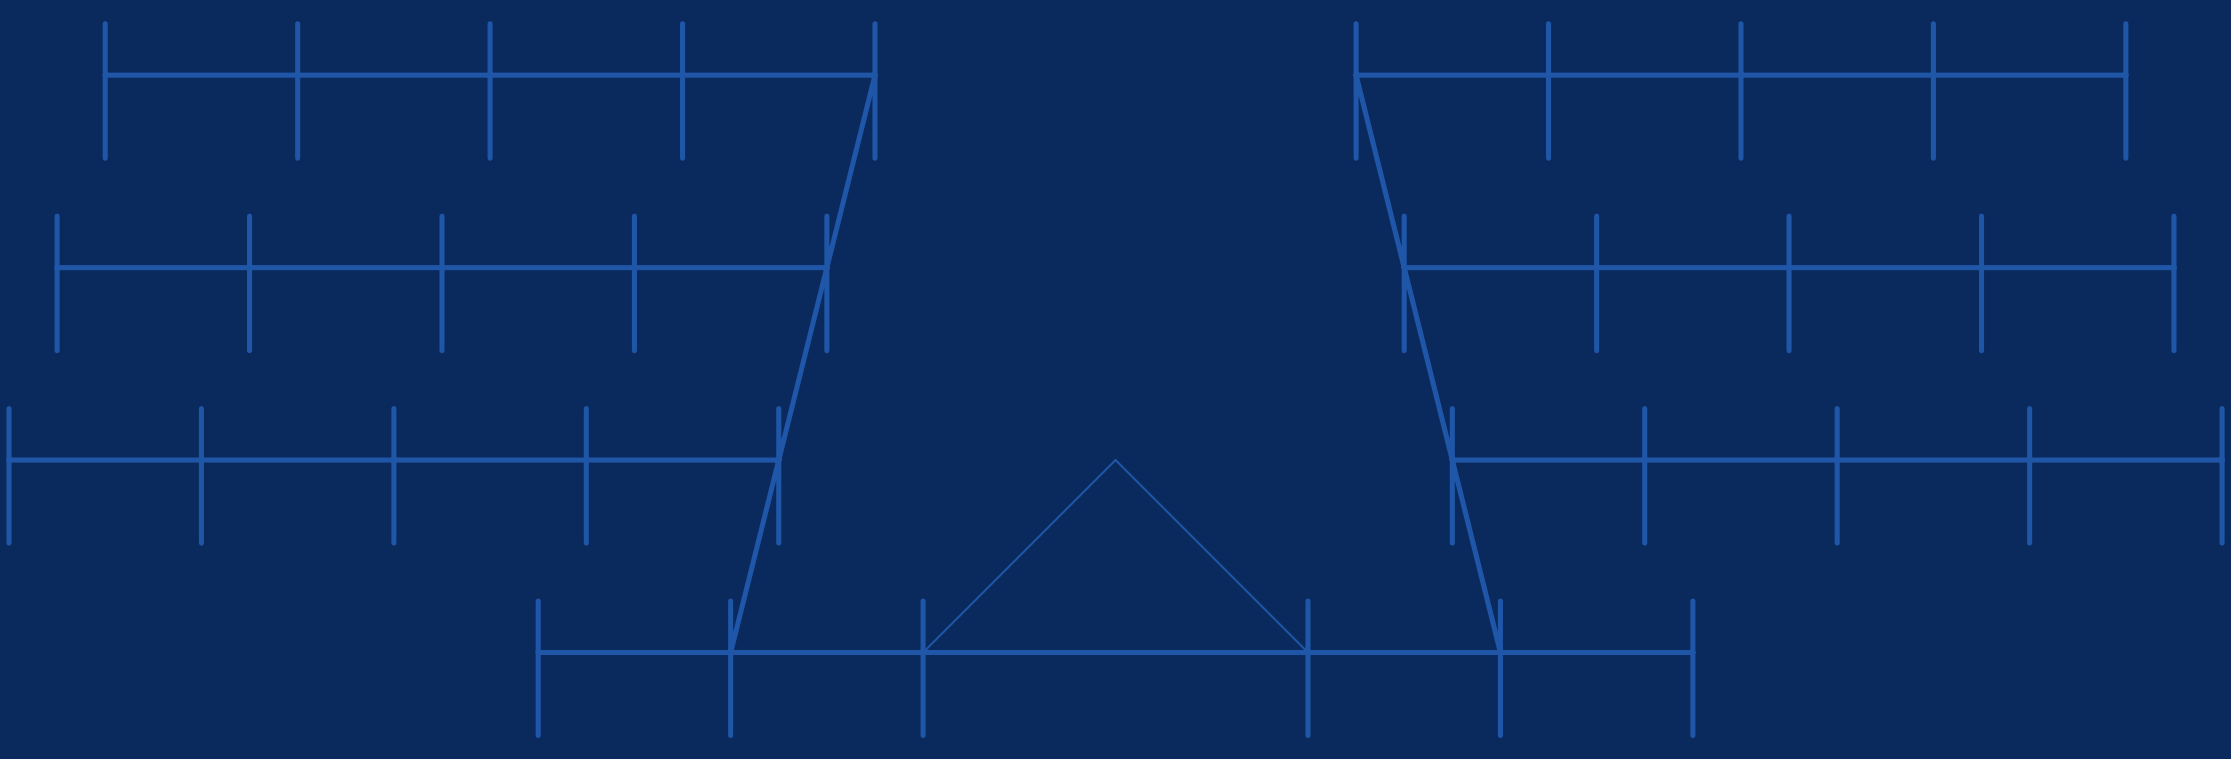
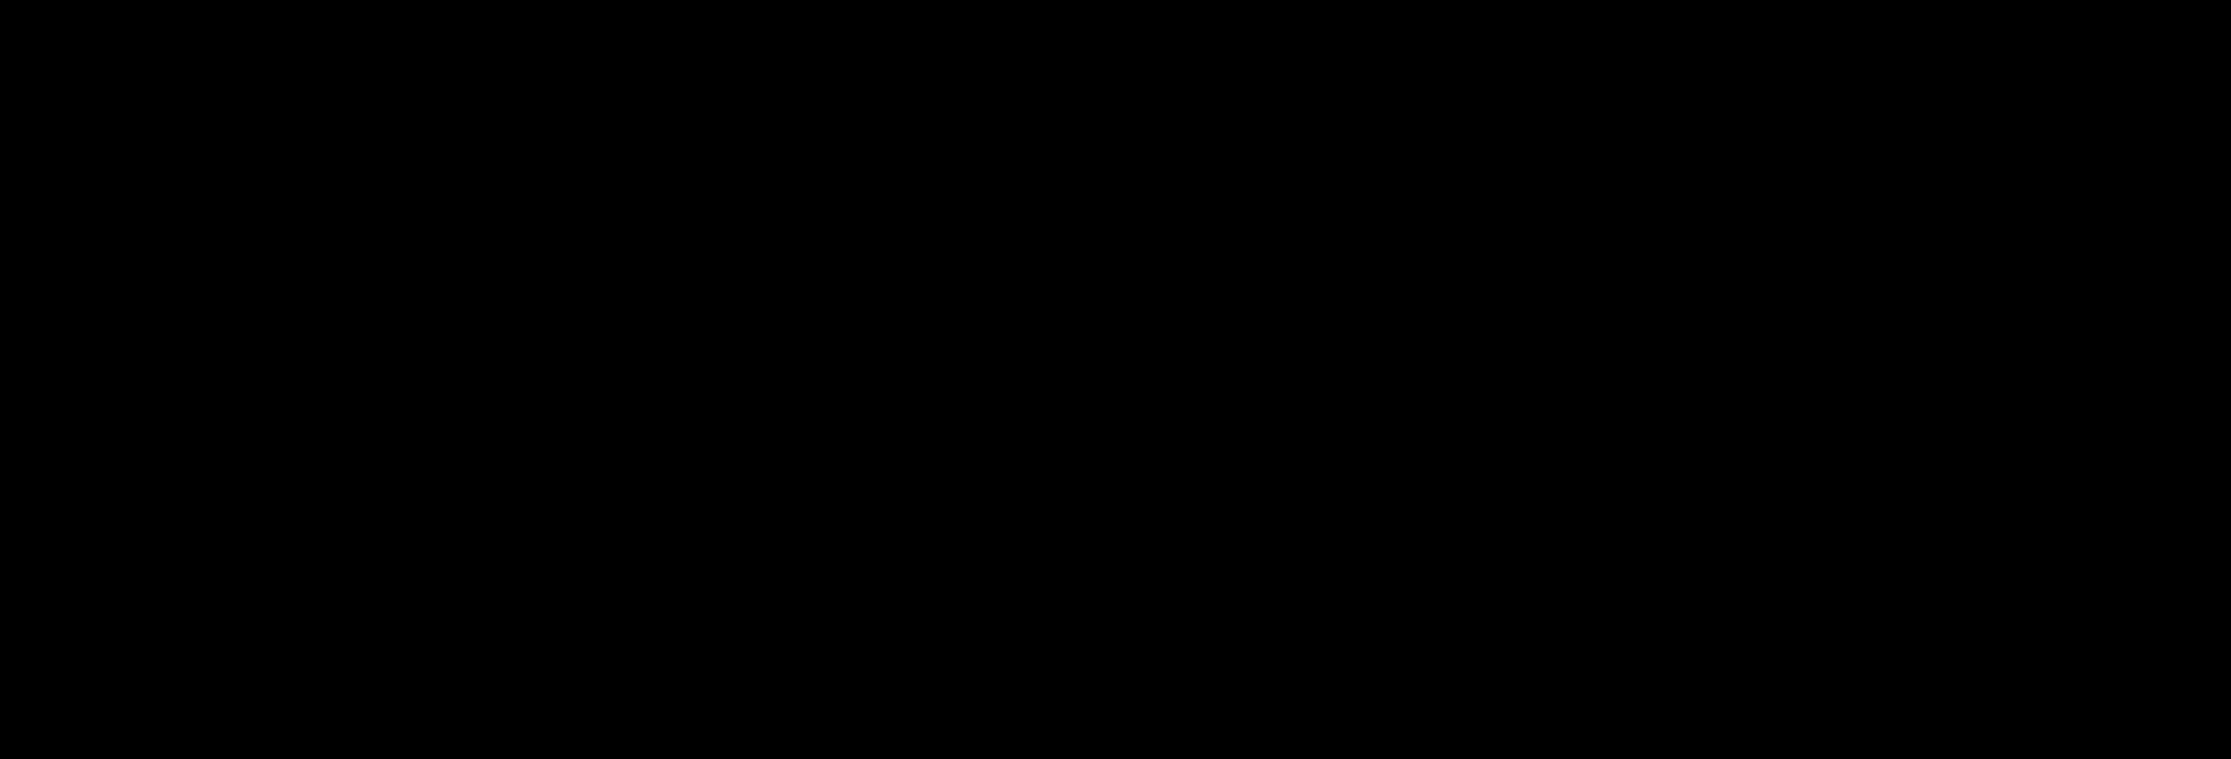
track: (105, 23) (105, 158) -> none
track: (297, 23) (297, 158) -> none
track: (490, 23) (490, 158) -> none
track: (682, 23) (682, 158) -> none
track: (874, 23) (874, 158) -> none
track: (1356, 23) (1356, 158) -> none
track: (1548, 23) (1548, 158) -> none
track: (1740, 23) (1740, 158) -> none
track: (1933, 23) (1933, 158) -> none
track: (2125, 23) (2125, 158) -> none
track: (105, 75) (874, 75) (826, 267) -> none
track: (2125, 75) (1356, 75) (1404, 267) -> none
track: (57, 216) (57, 350) -> none
track: (249, 216) (249, 350) -> none
track: (441, 216) (441, 350) -> none
track: (634, 216) (634, 350) -> none
track: (826, 216) (826, 350) -> none
track: (1404, 216) (1404, 350) -> none
track: (1596, 216) (1596, 350) -> none
track: (1789, 216) (1789, 350) -> none
track: (1981, 216) (1981, 350) -> none
track: (2173, 216) (2173, 350) -> none
track: (57, 267) (826, 267) -> none
track: (826, 267) (778, 460) -> none
track: (1404, 267) (2173, 267) -> none
track: (1404, 267) (1452, 460) -> none
track: (8, 408) (8, 543) -> none
track: (201, 408) (201, 543) -> none
track: (393, 408) (393, 543) -> none
track: (586, 408) (586, 543) -> none
track: (778, 408) (778, 543) -> none
track: (1452, 408) (1452, 543) -> none
track: (1644, 408) (1644, 543) -> none
track: (1837, 408) (1837, 543) -> none
track: (2029, 408) (2029, 543) -> none
track: (2222, 408) (2222, 543) -> none
track: (8, 460) (778, 460) -> none
track: (778, 460) (730, 652) -> none
track: (1452, 460) (2222, 460) -> none
track: (1452, 460) (1500, 652) -> none
track: (538, 601) (538, 735) -> none
track: (730, 601) (730, 735) -> none
track: (923, 601) (923, 735) -> none
track: (1307, 601) (1307, 735) -> none
track: (1500, 601) (1500, 735) -> none
track: (1692, 601) (1692, 735) -> none
track: (538, 652) (1692, 652) -> none
track: (923, 652) (1115, 460) (1307, 652) -> none

